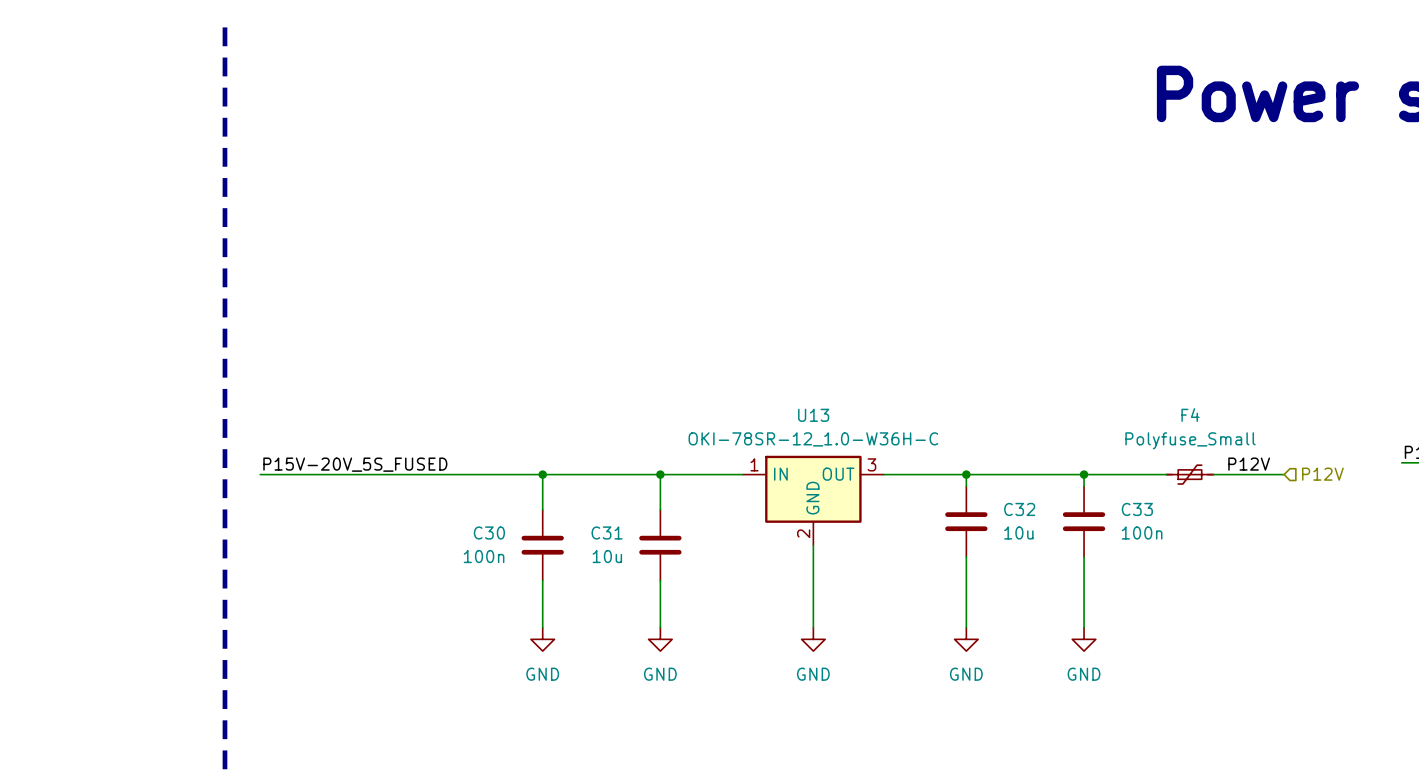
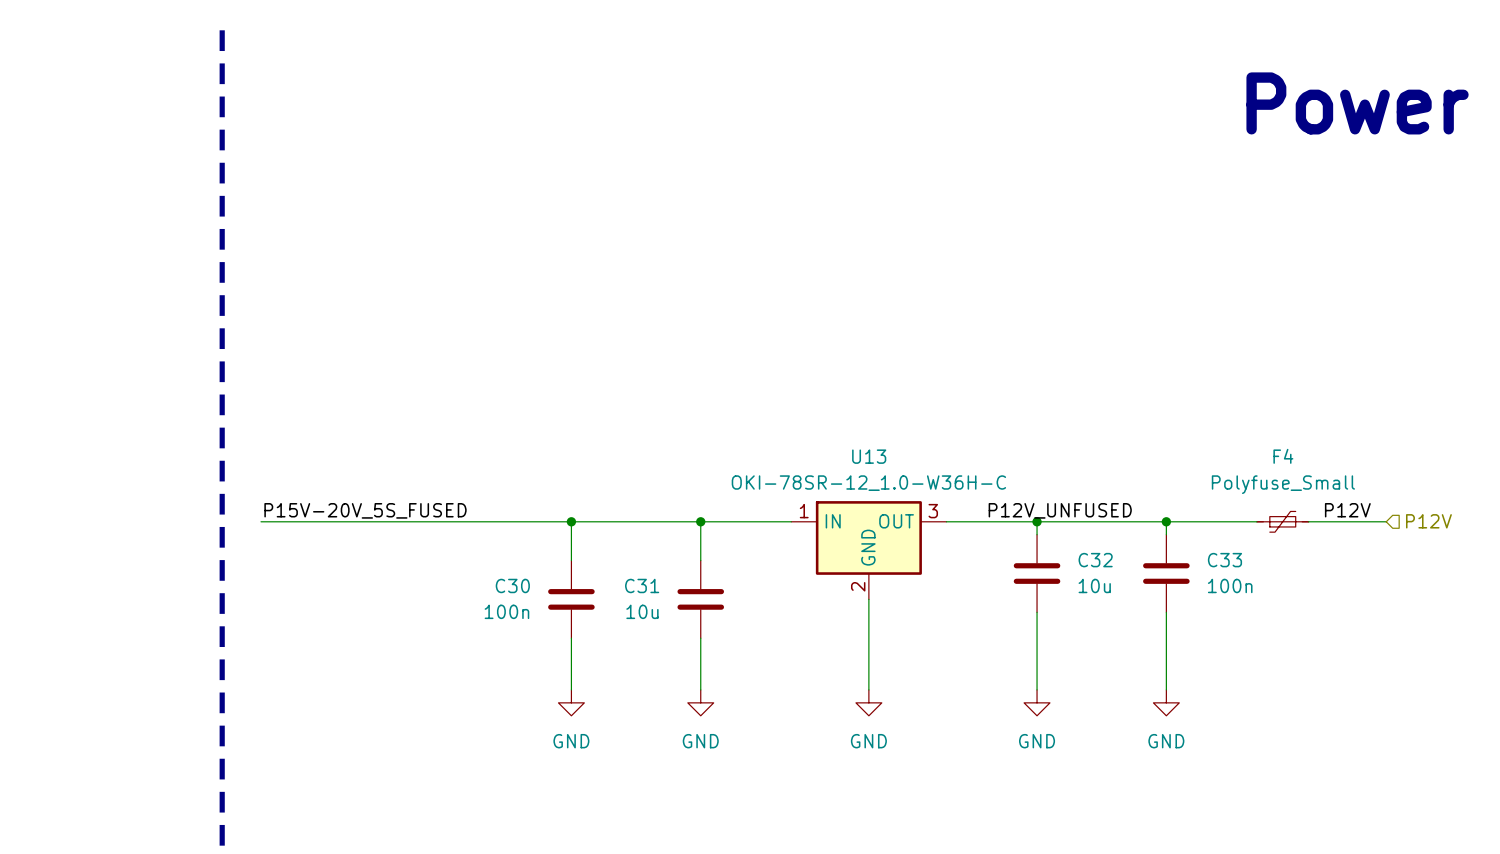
label: none -> P12V_UNFUSED (1060, 510)

